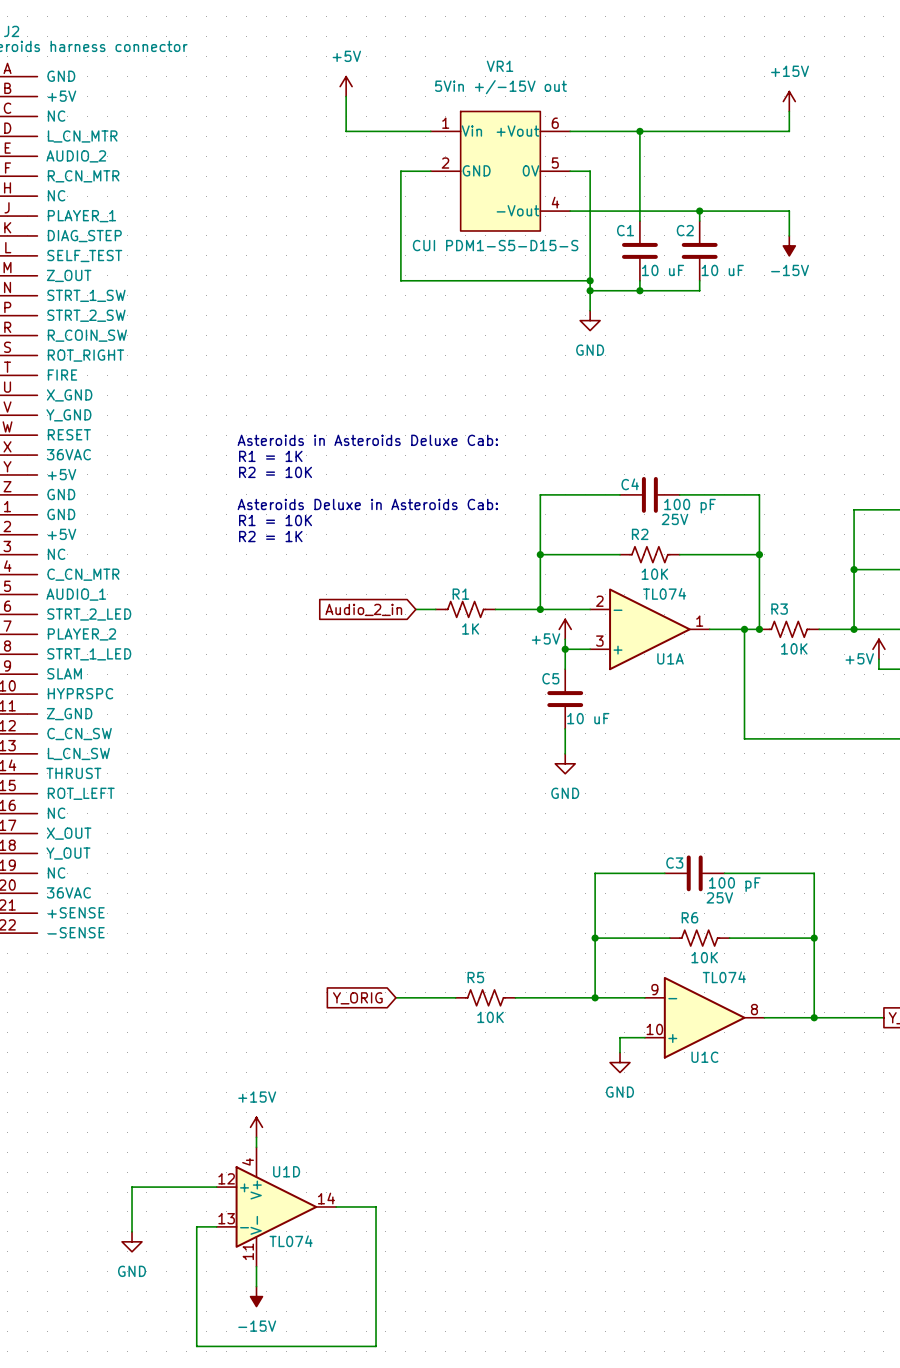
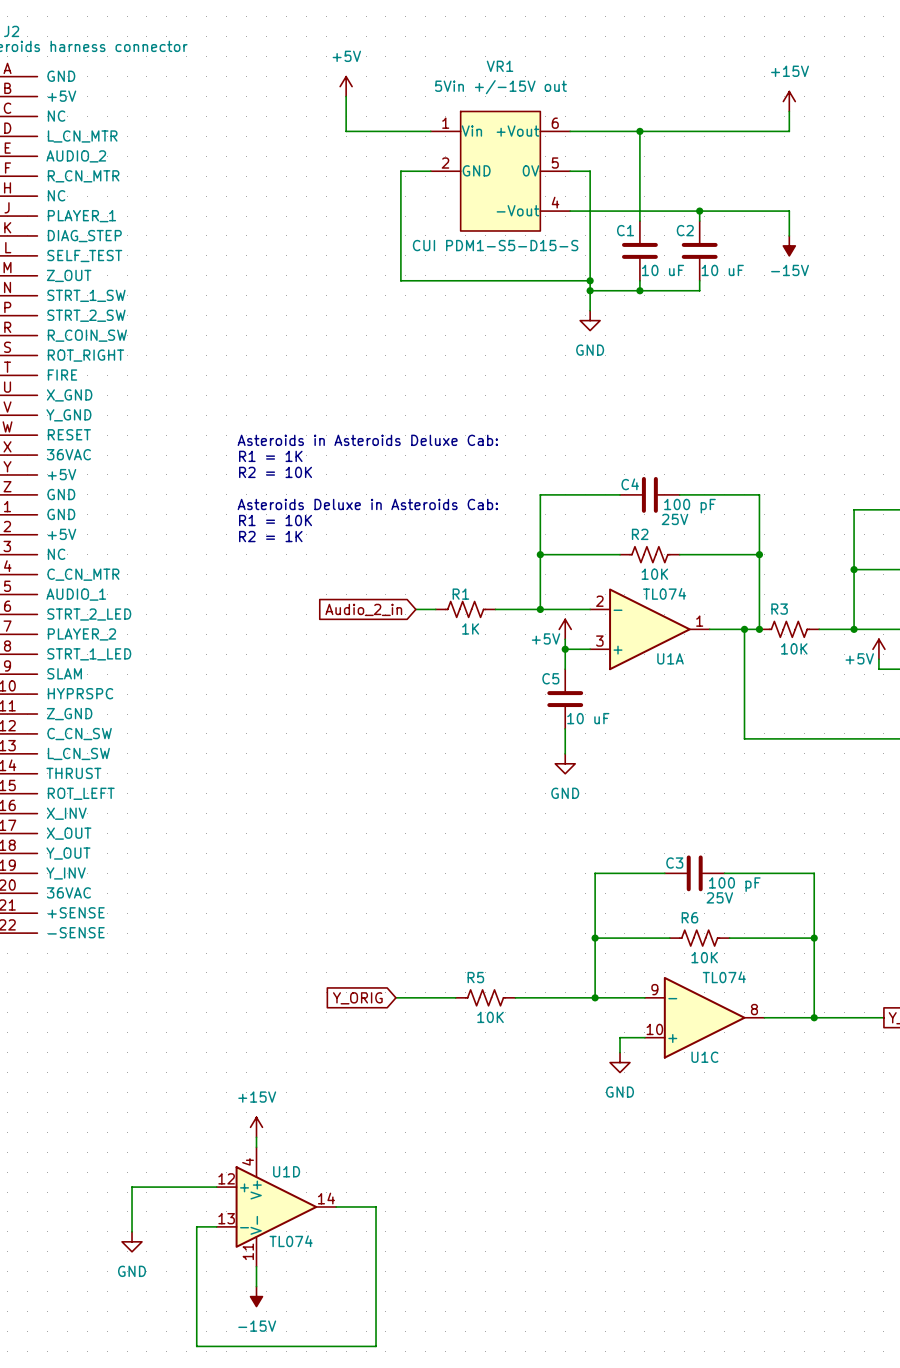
J2 pin name: NC (56, 813) -> X_INV (66, 813)
J2 pin name: NC (56, 872) -> Y_INV (66, 873)

